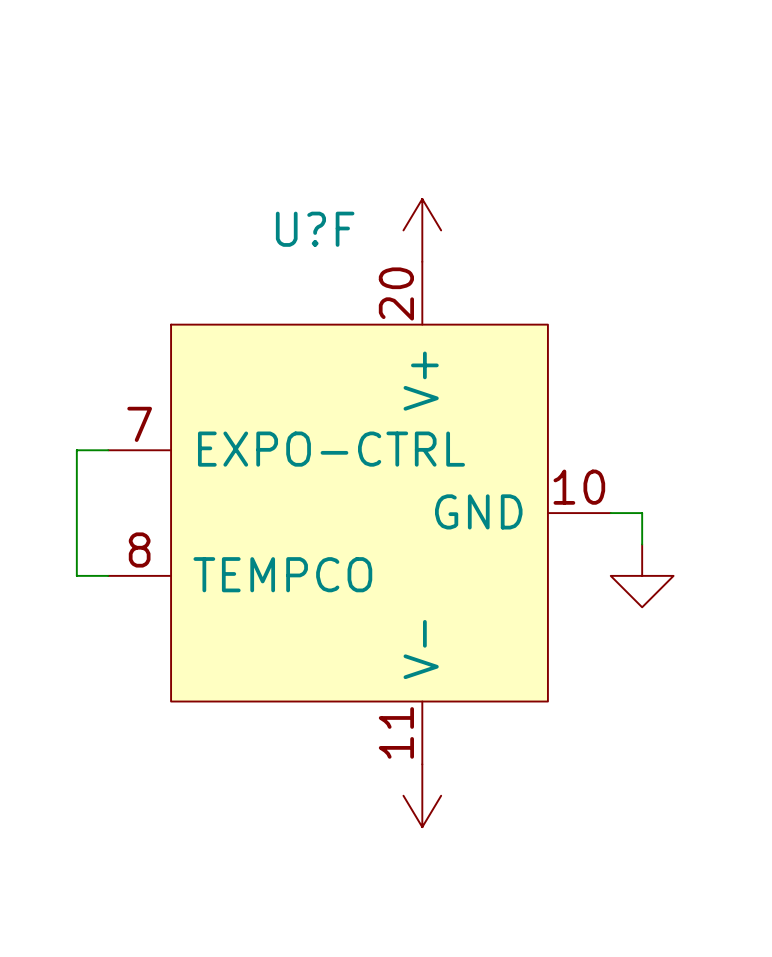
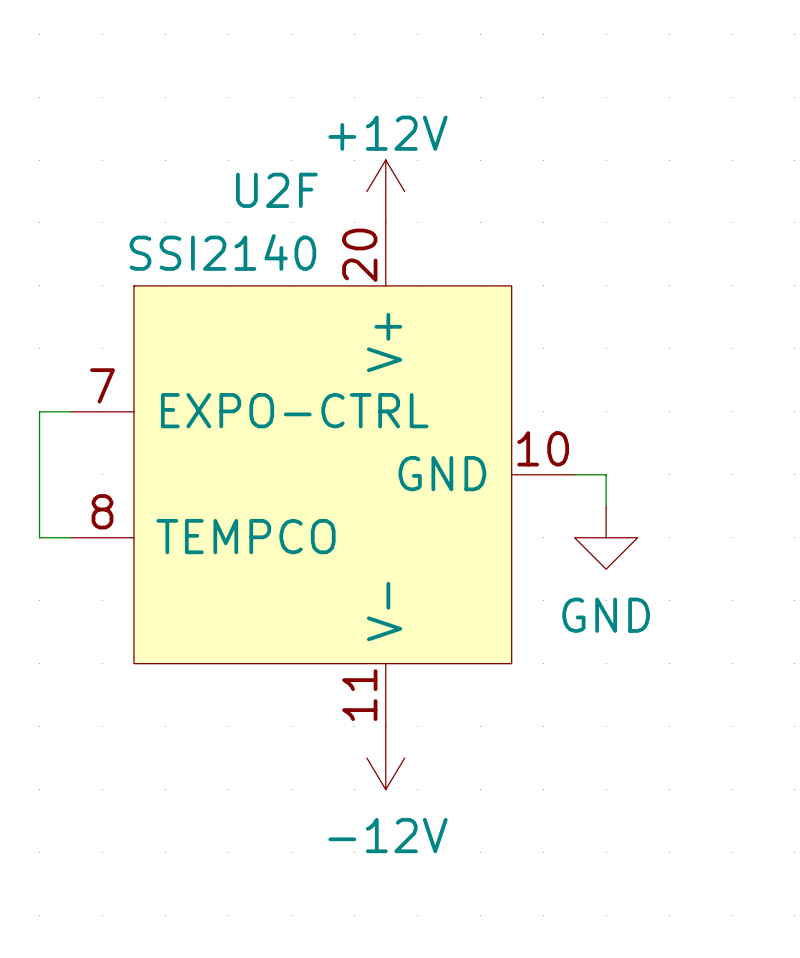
power symbol text: none -> +12V (388, 133)
U?F name: U?F (315, 229) -> U2F (276, 190)
U?F value: none -> SSI2140 (222, 252)
power symbol text: none -> GND (606, 615)
power symbol text: none -> -12V (388, 835)

